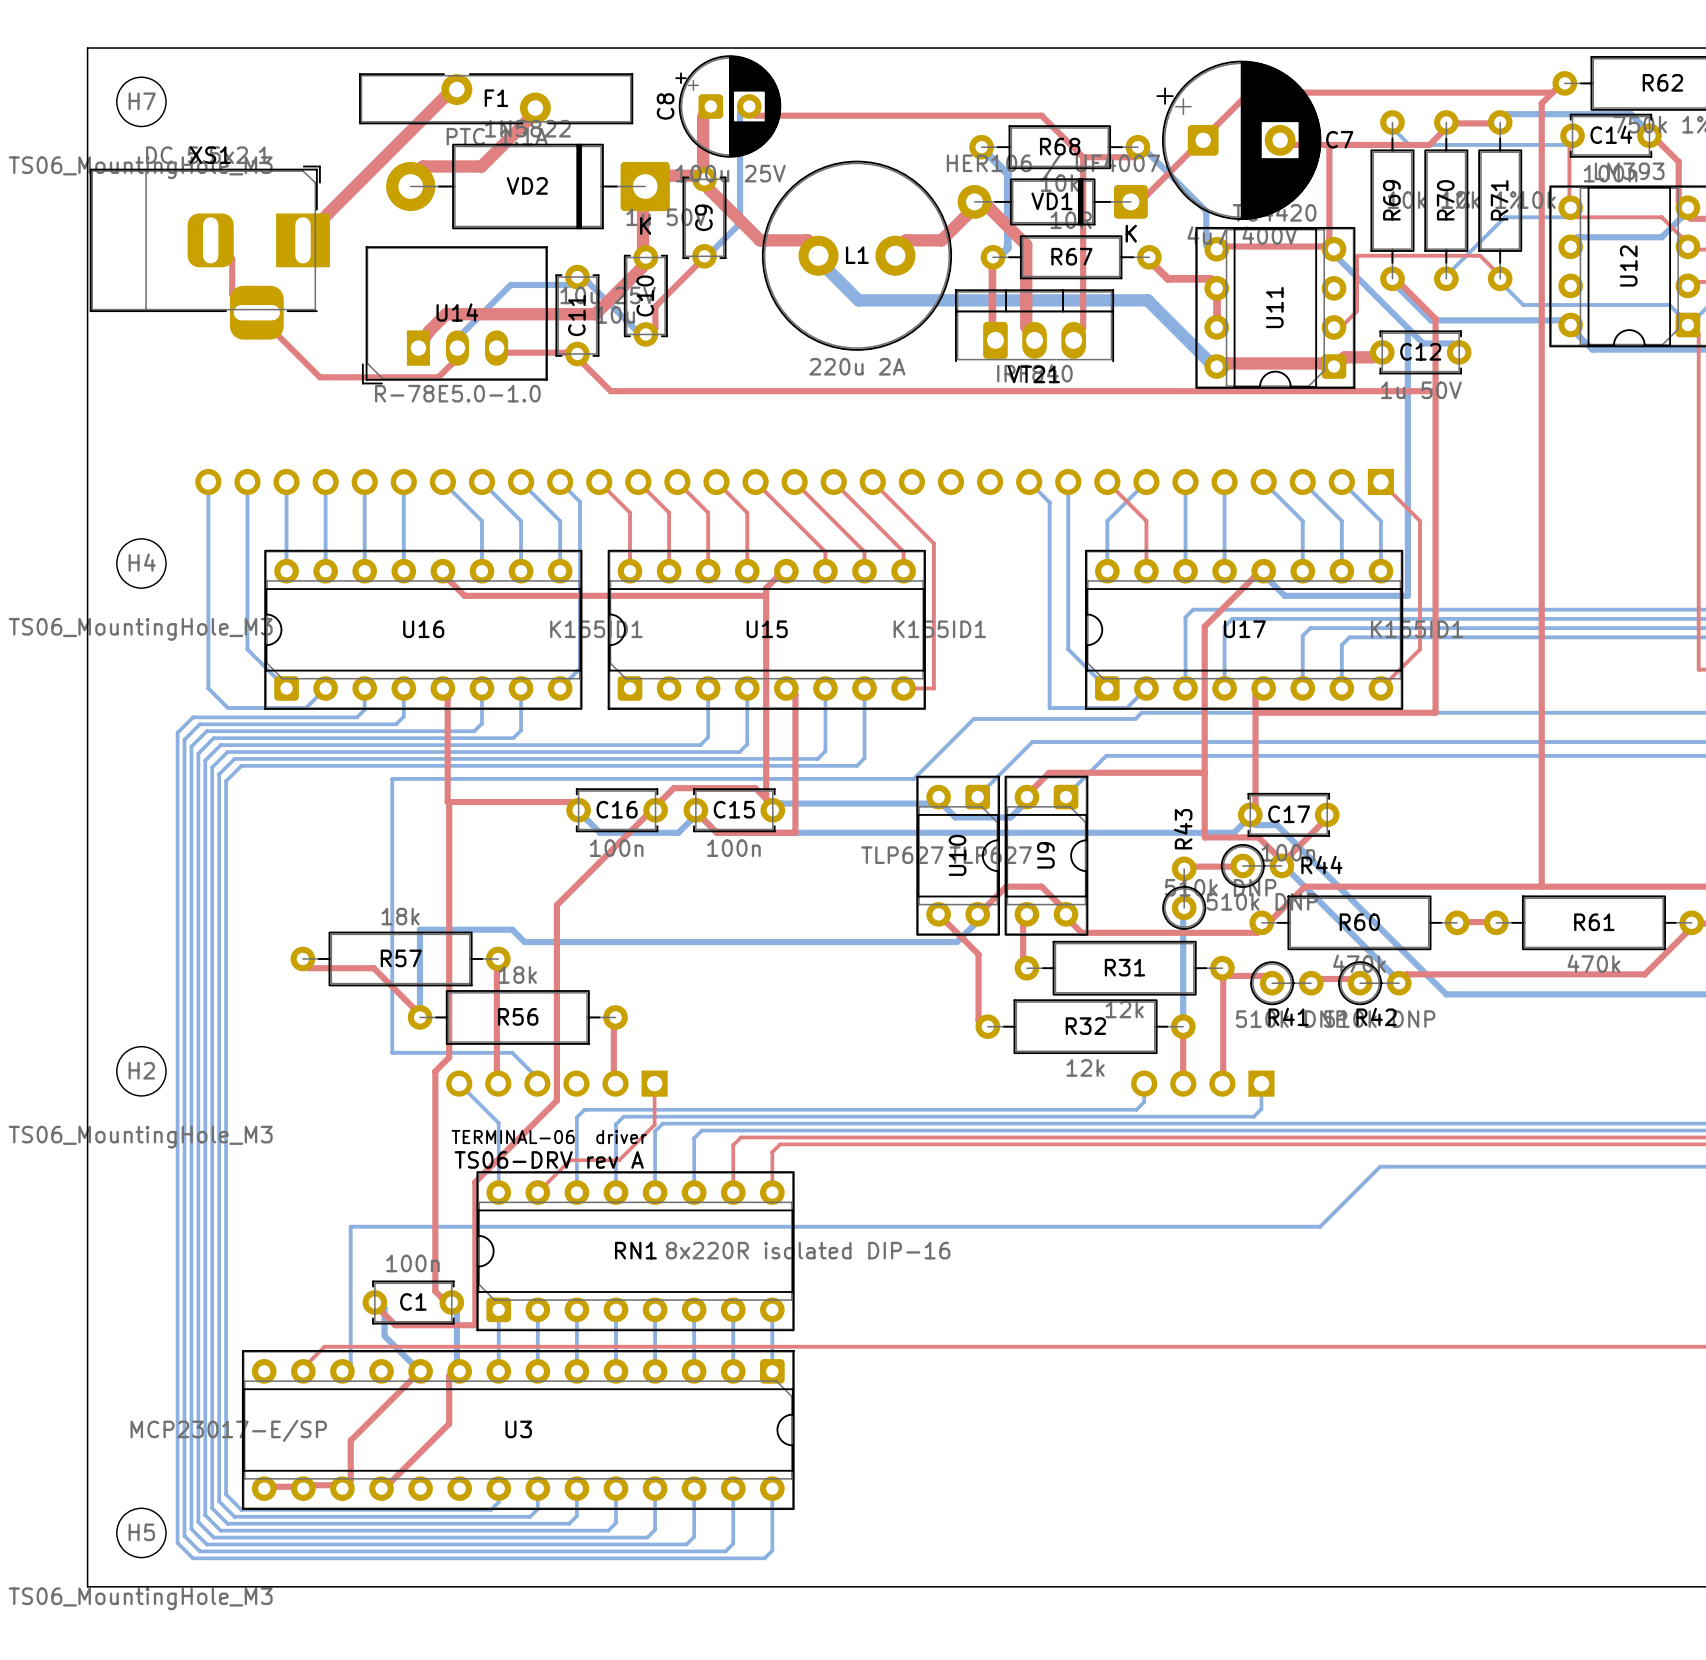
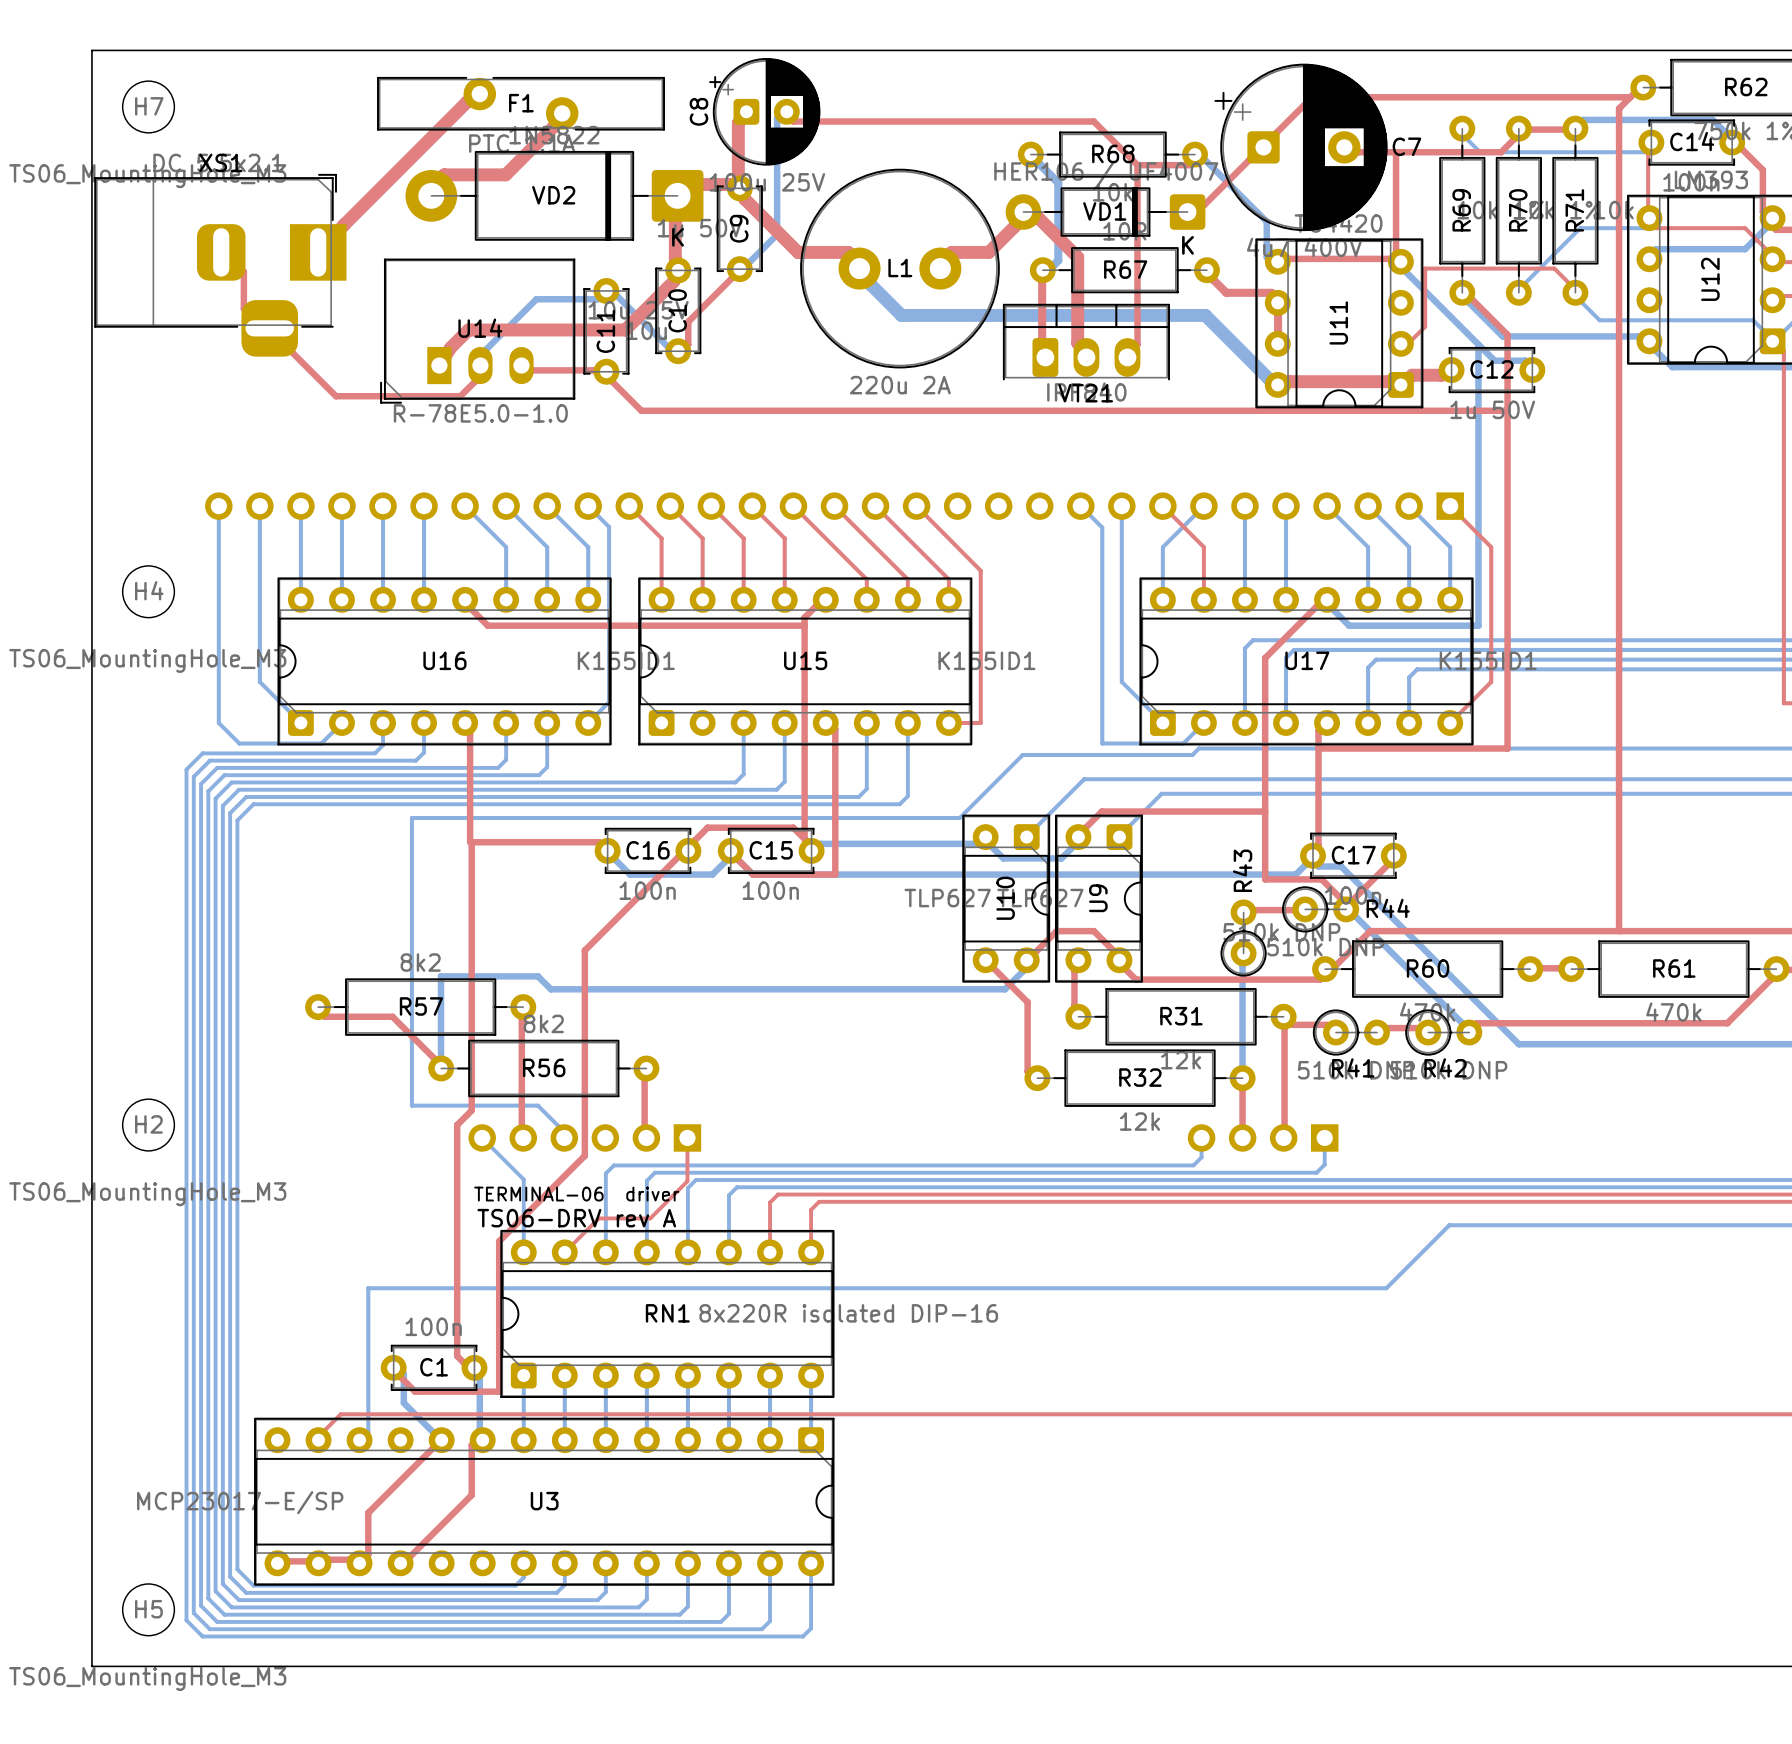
R57 value: 18k (400, 916) -> 8k2 (420, 962)
R56 value: 18k (517, 975) -> 8k2 (543, 1023)

